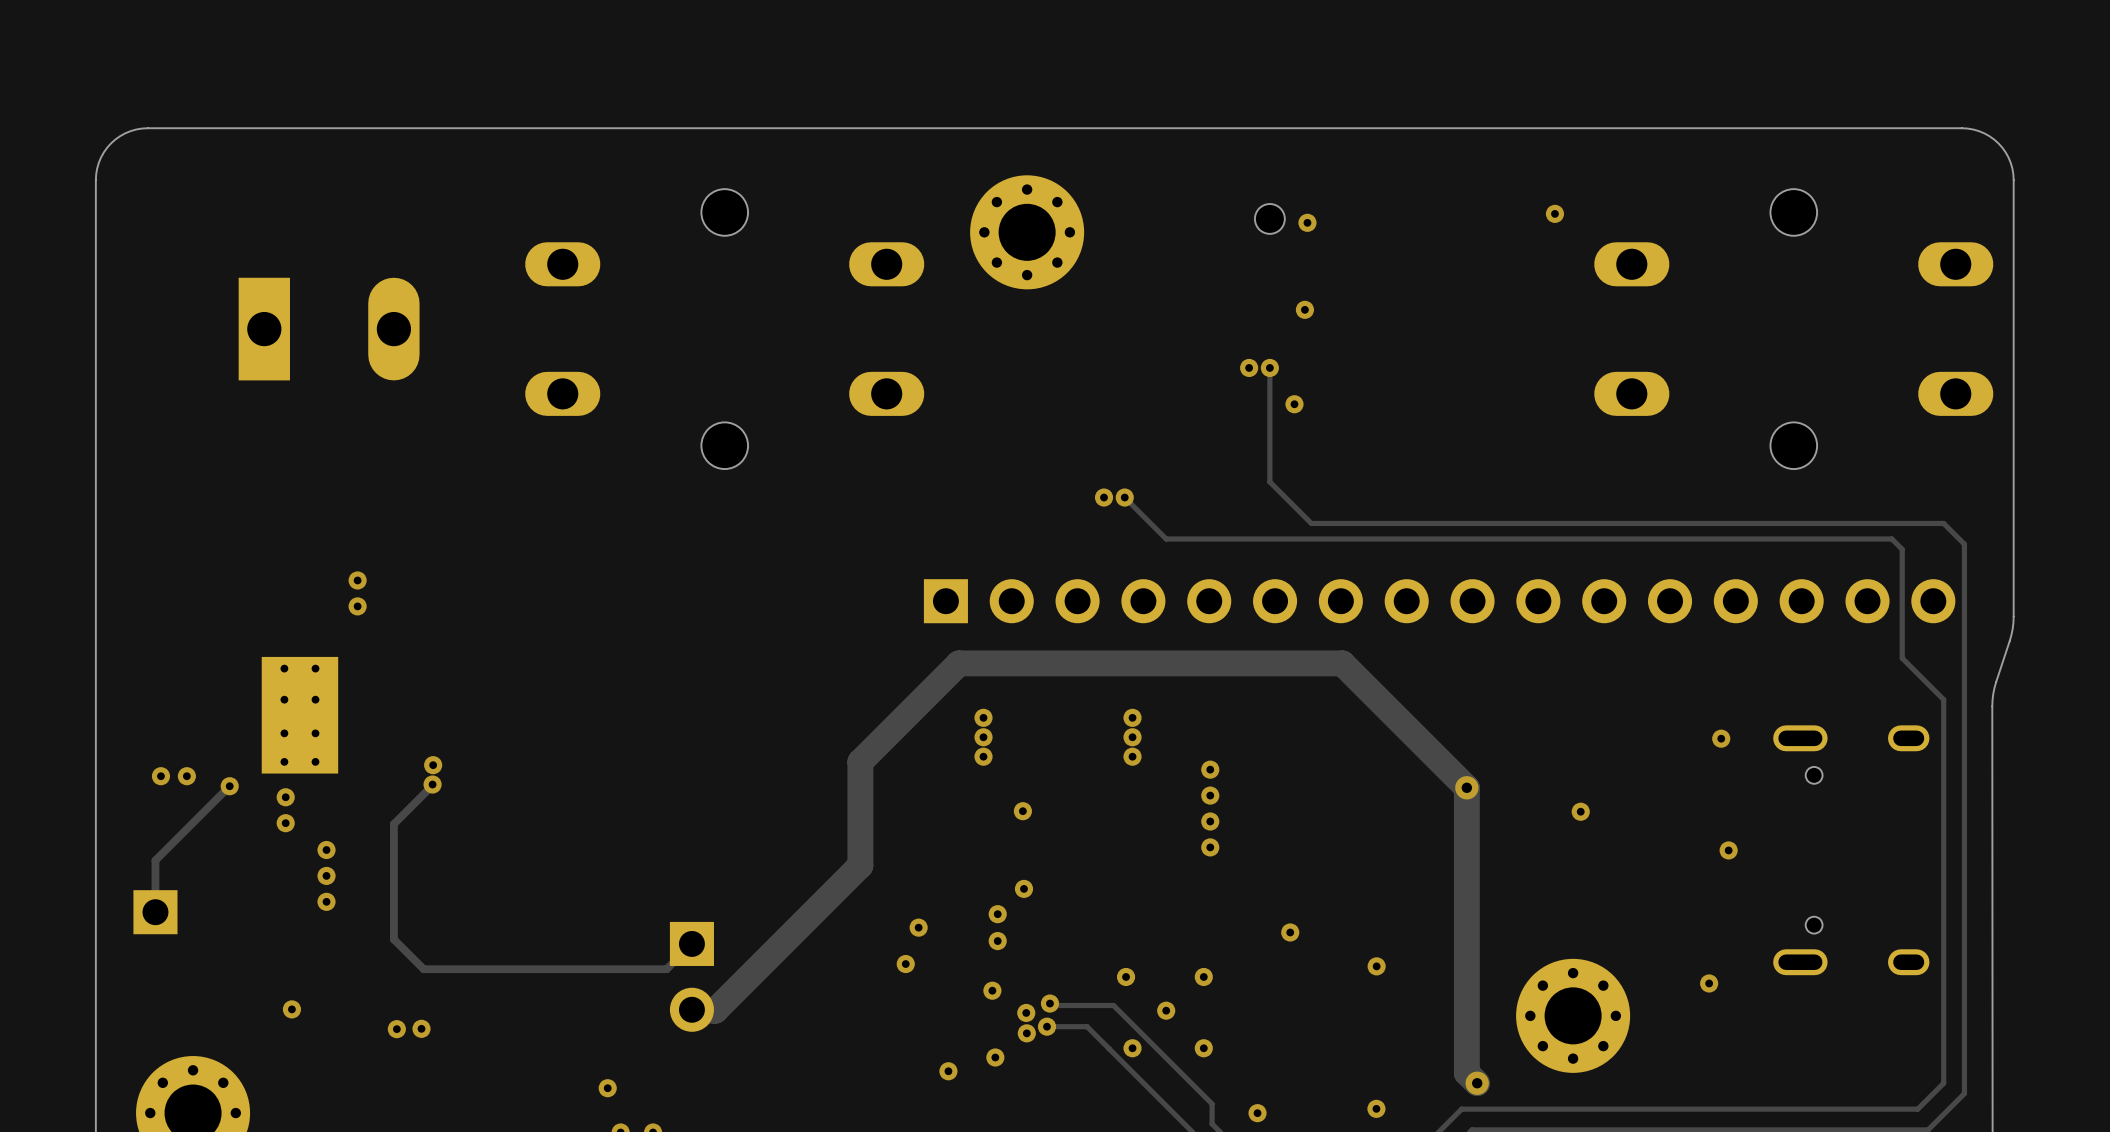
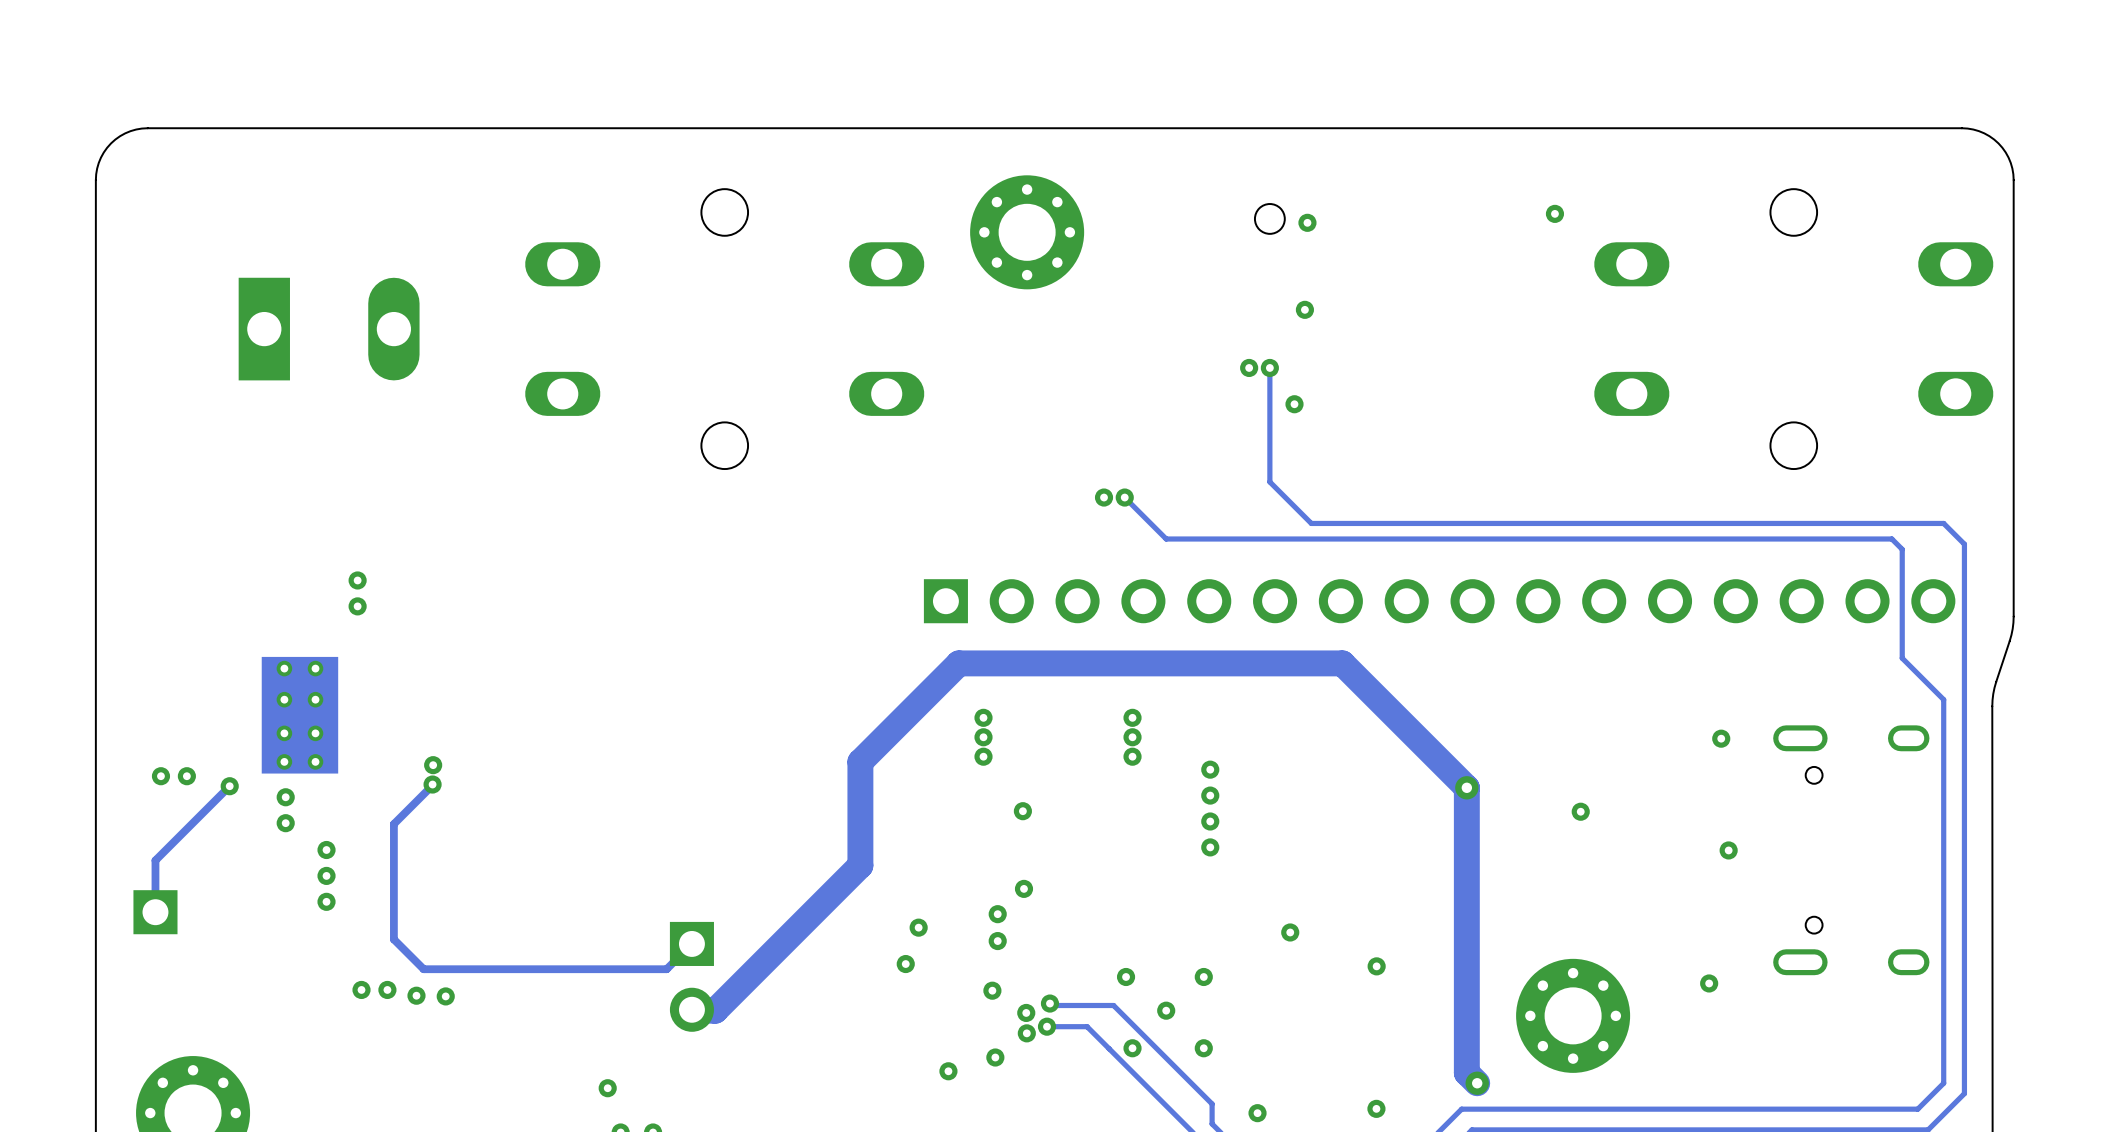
via: none -> (361, 989)
via: none -> (387, 989)
via: none -> (416, 995)
via: none -> (445, 996)
via: (291, 1009) -> none
via: (421, 1028) -> none
via: (396, 1029) -> none

